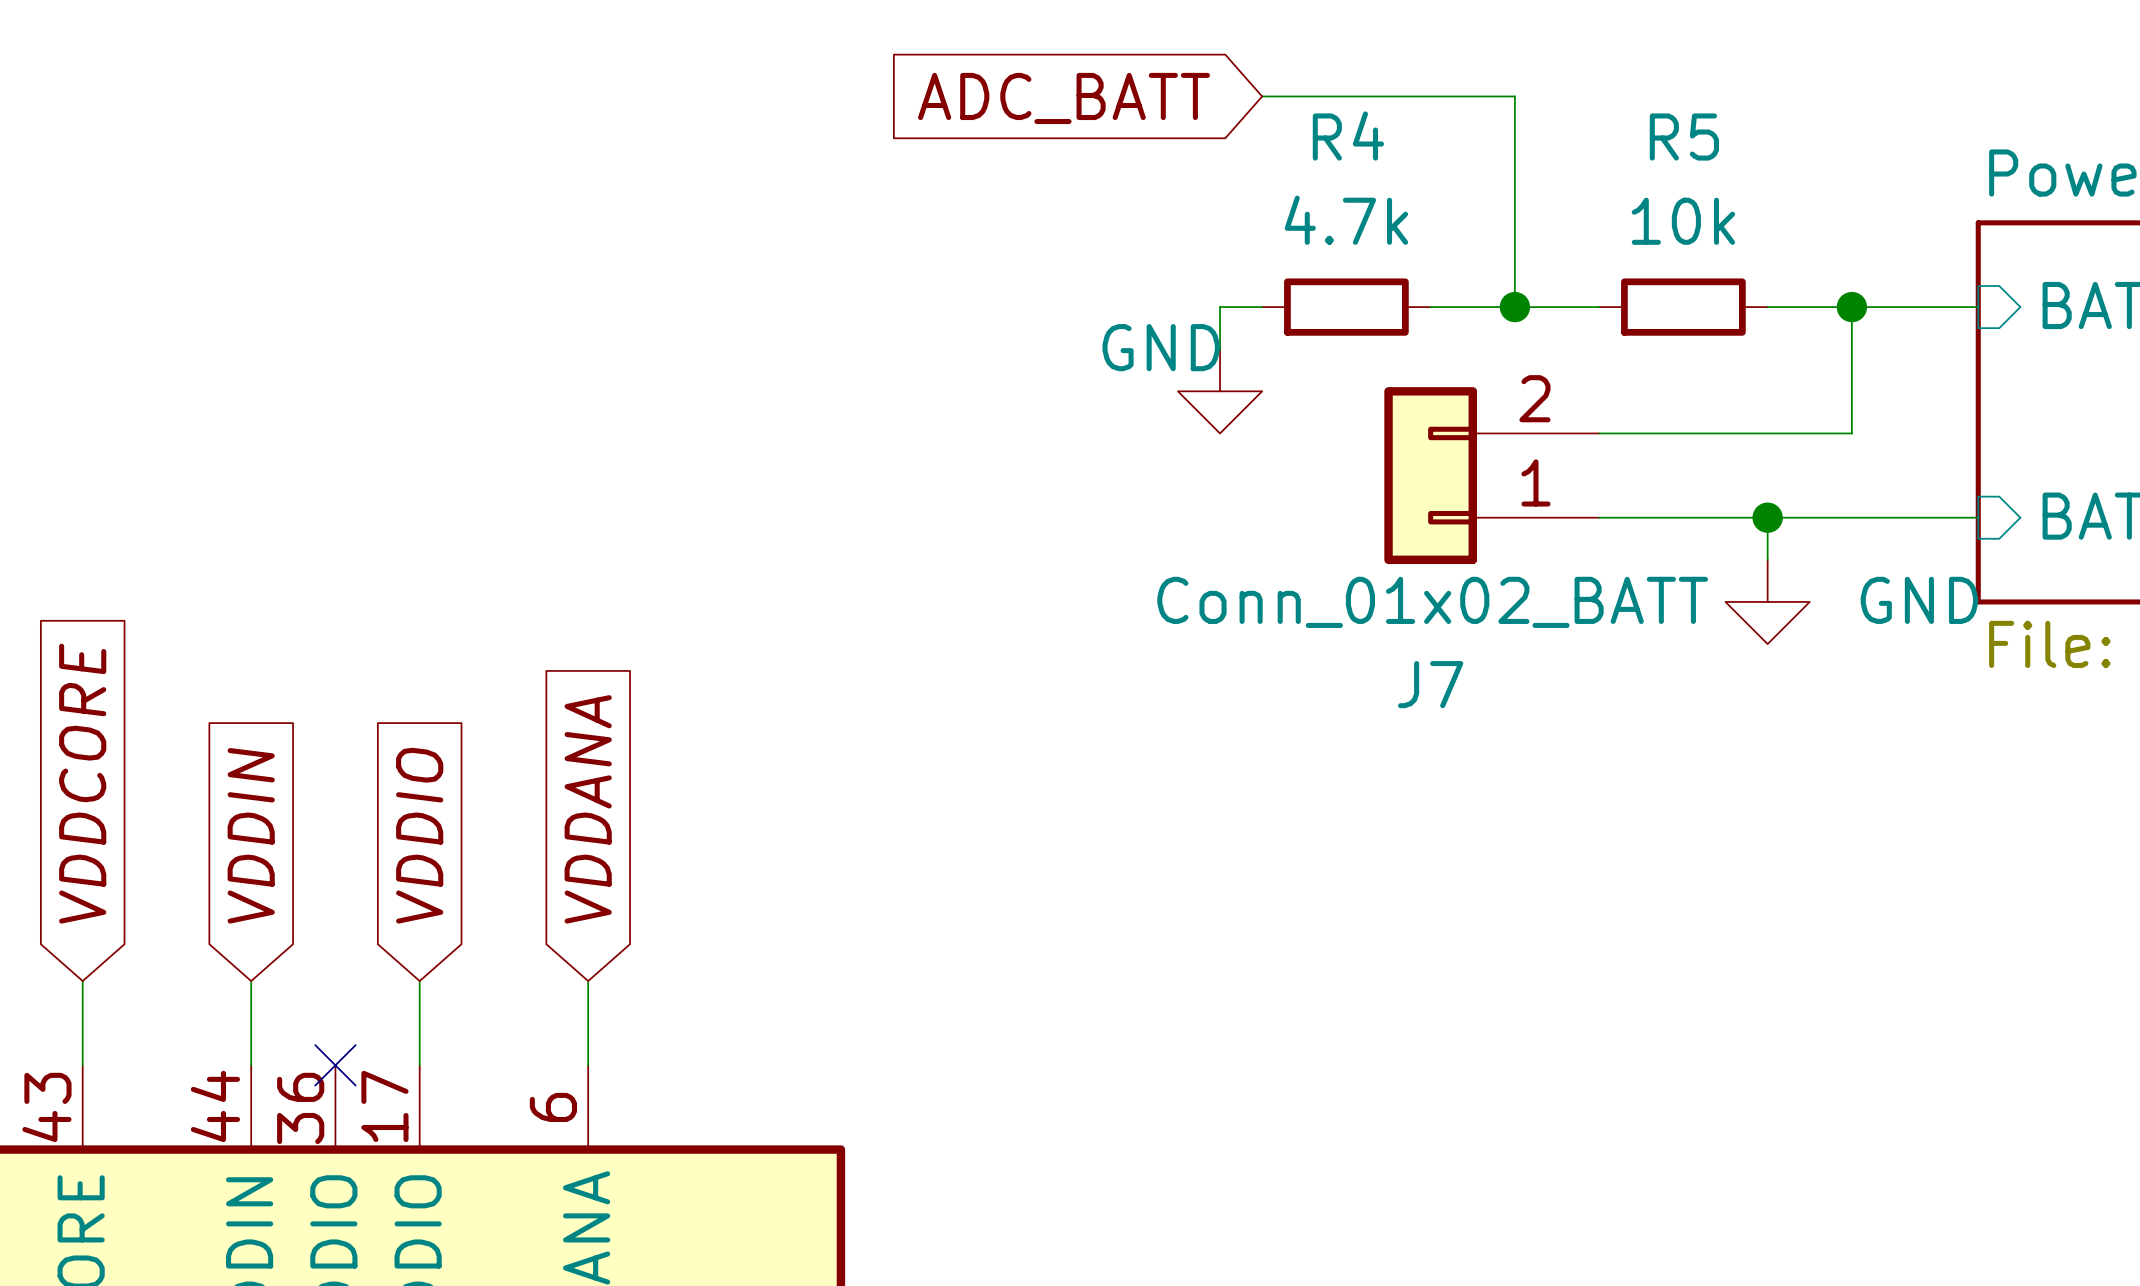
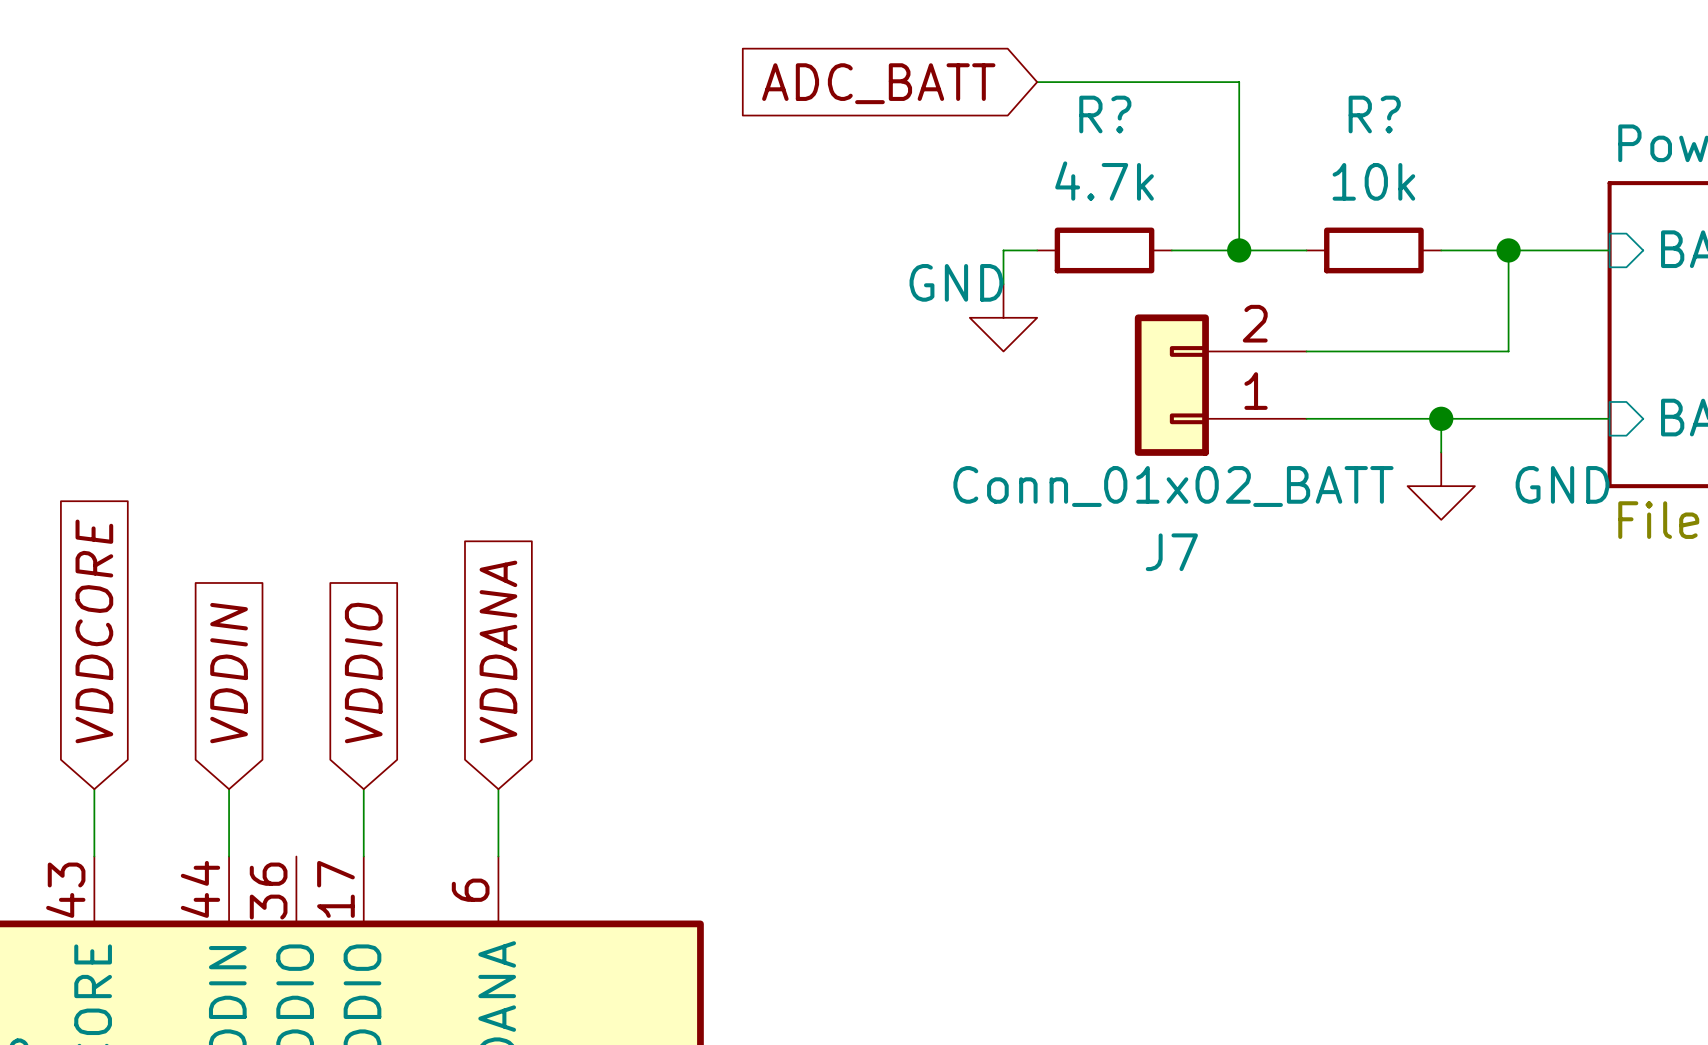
R4 name: R4 (1348, 136) -> R? (1105, 114)
R5 name: R5 (1684, 137) -> R? (1374, 114)
no-connect mark: (335, 1065) -> none

